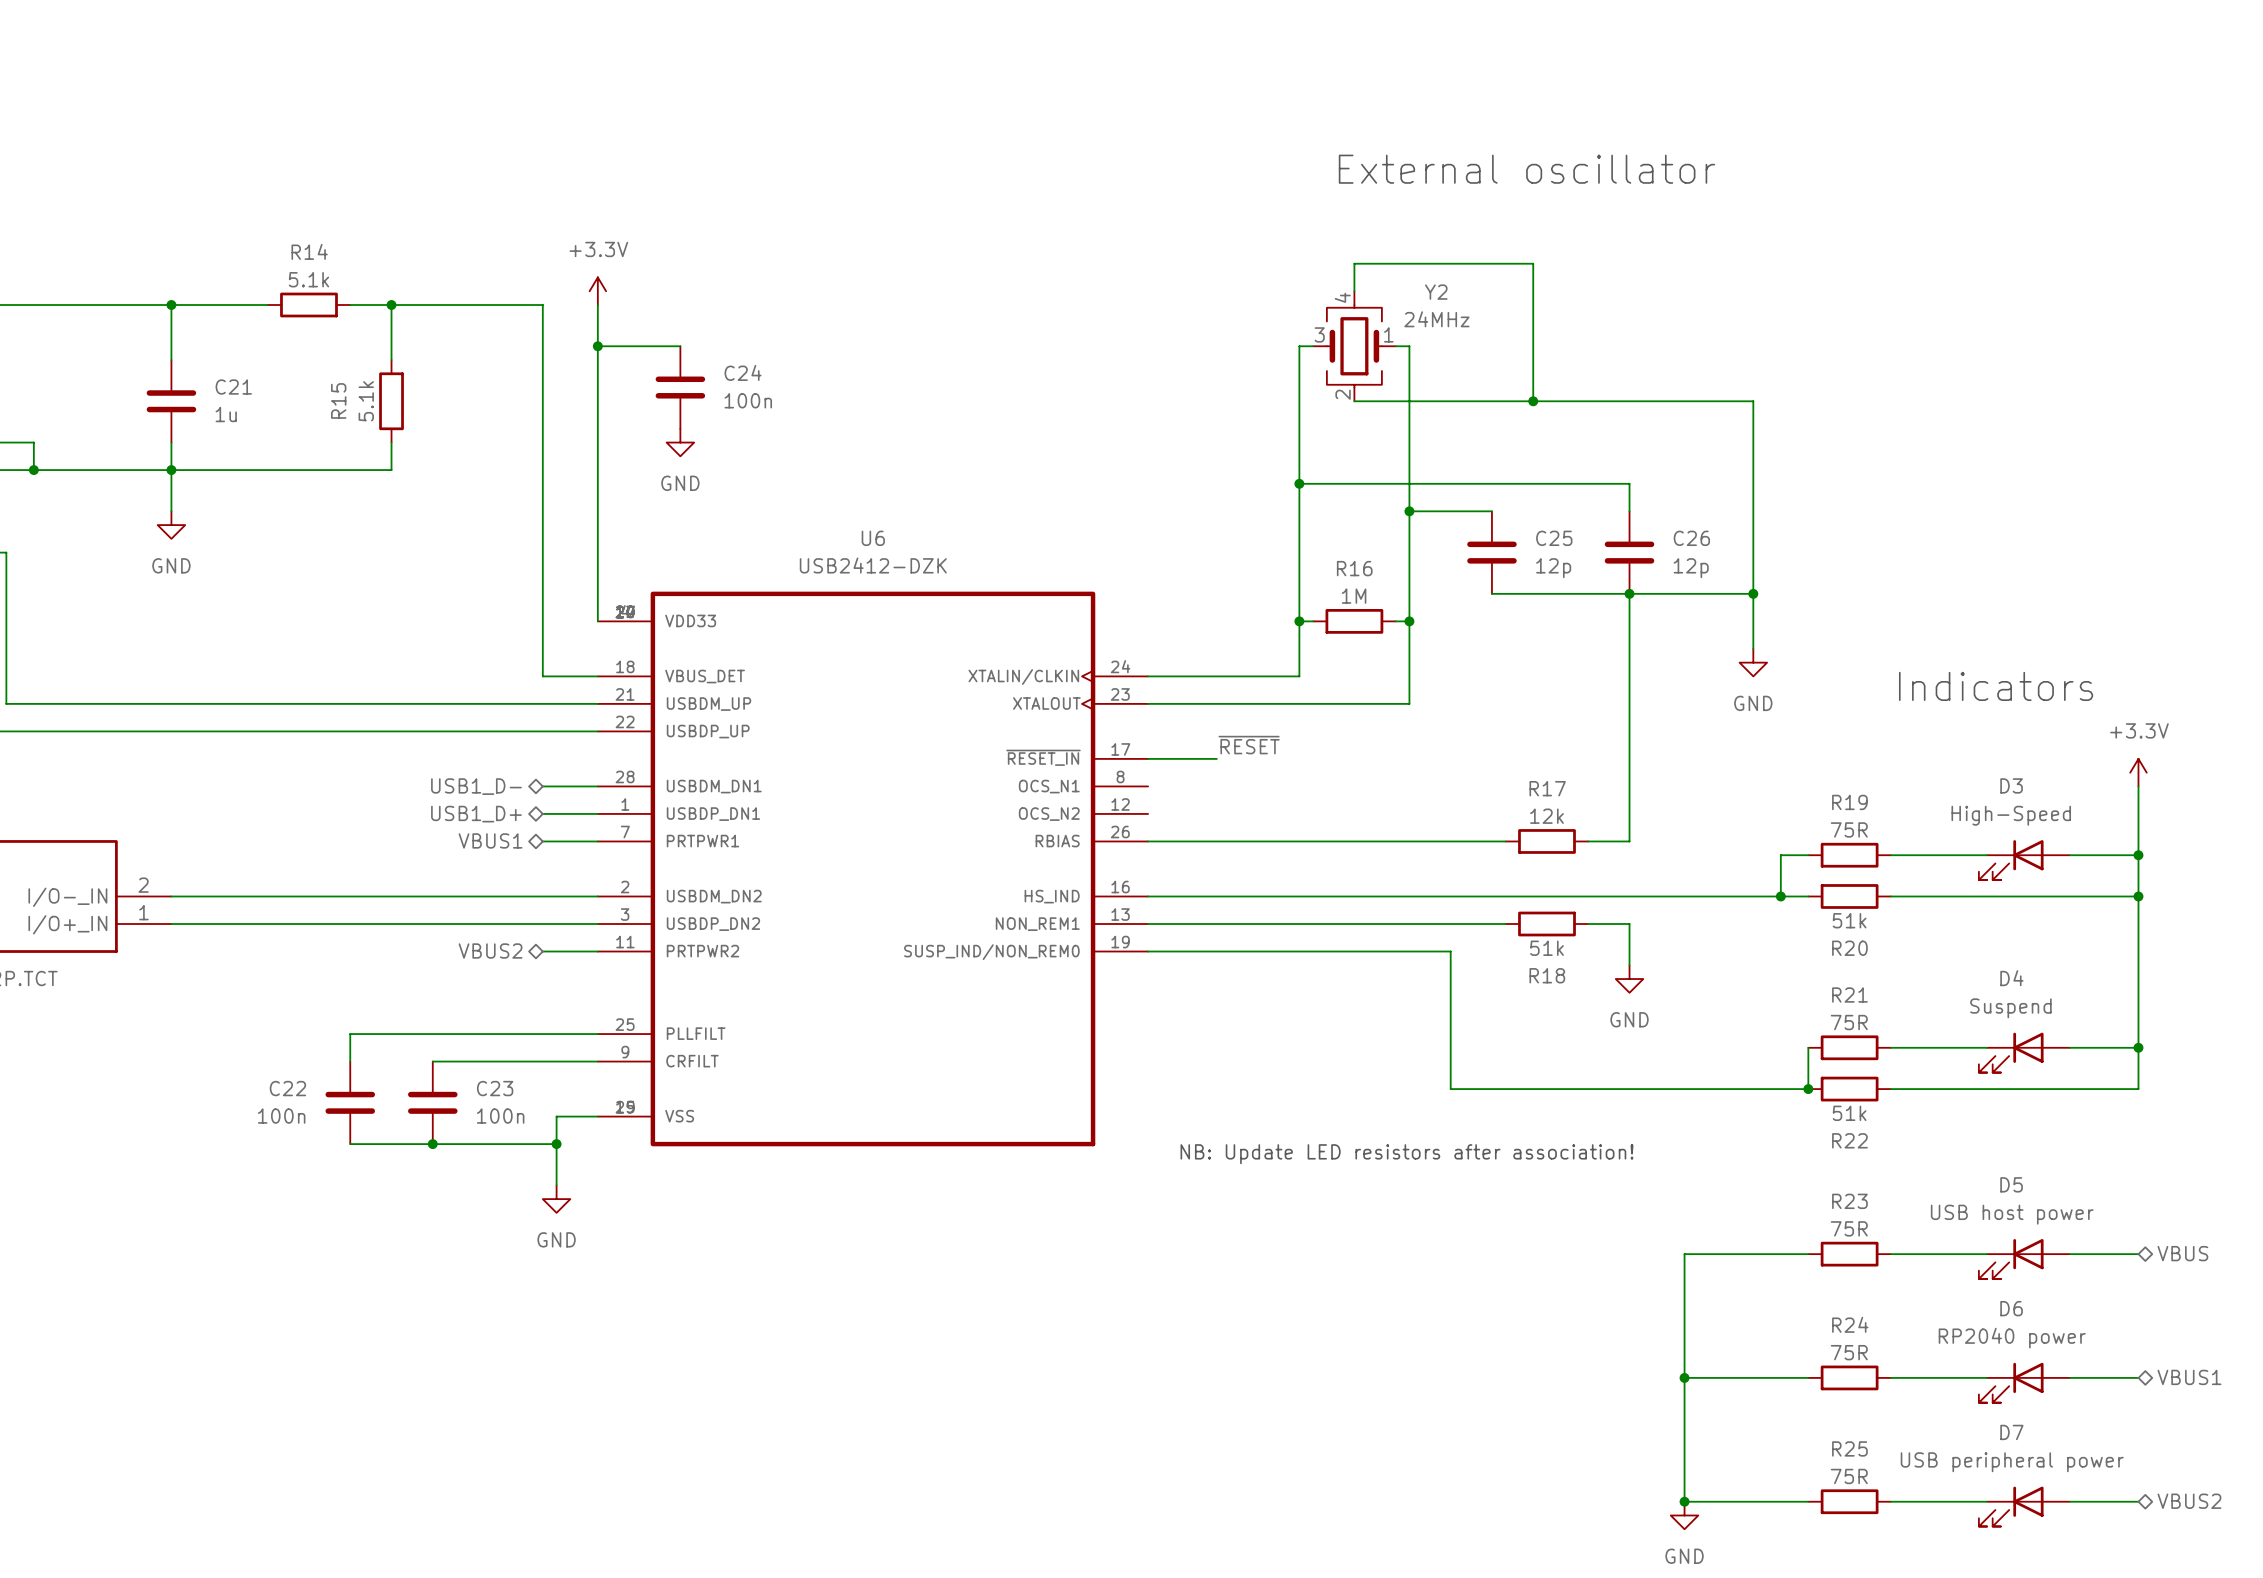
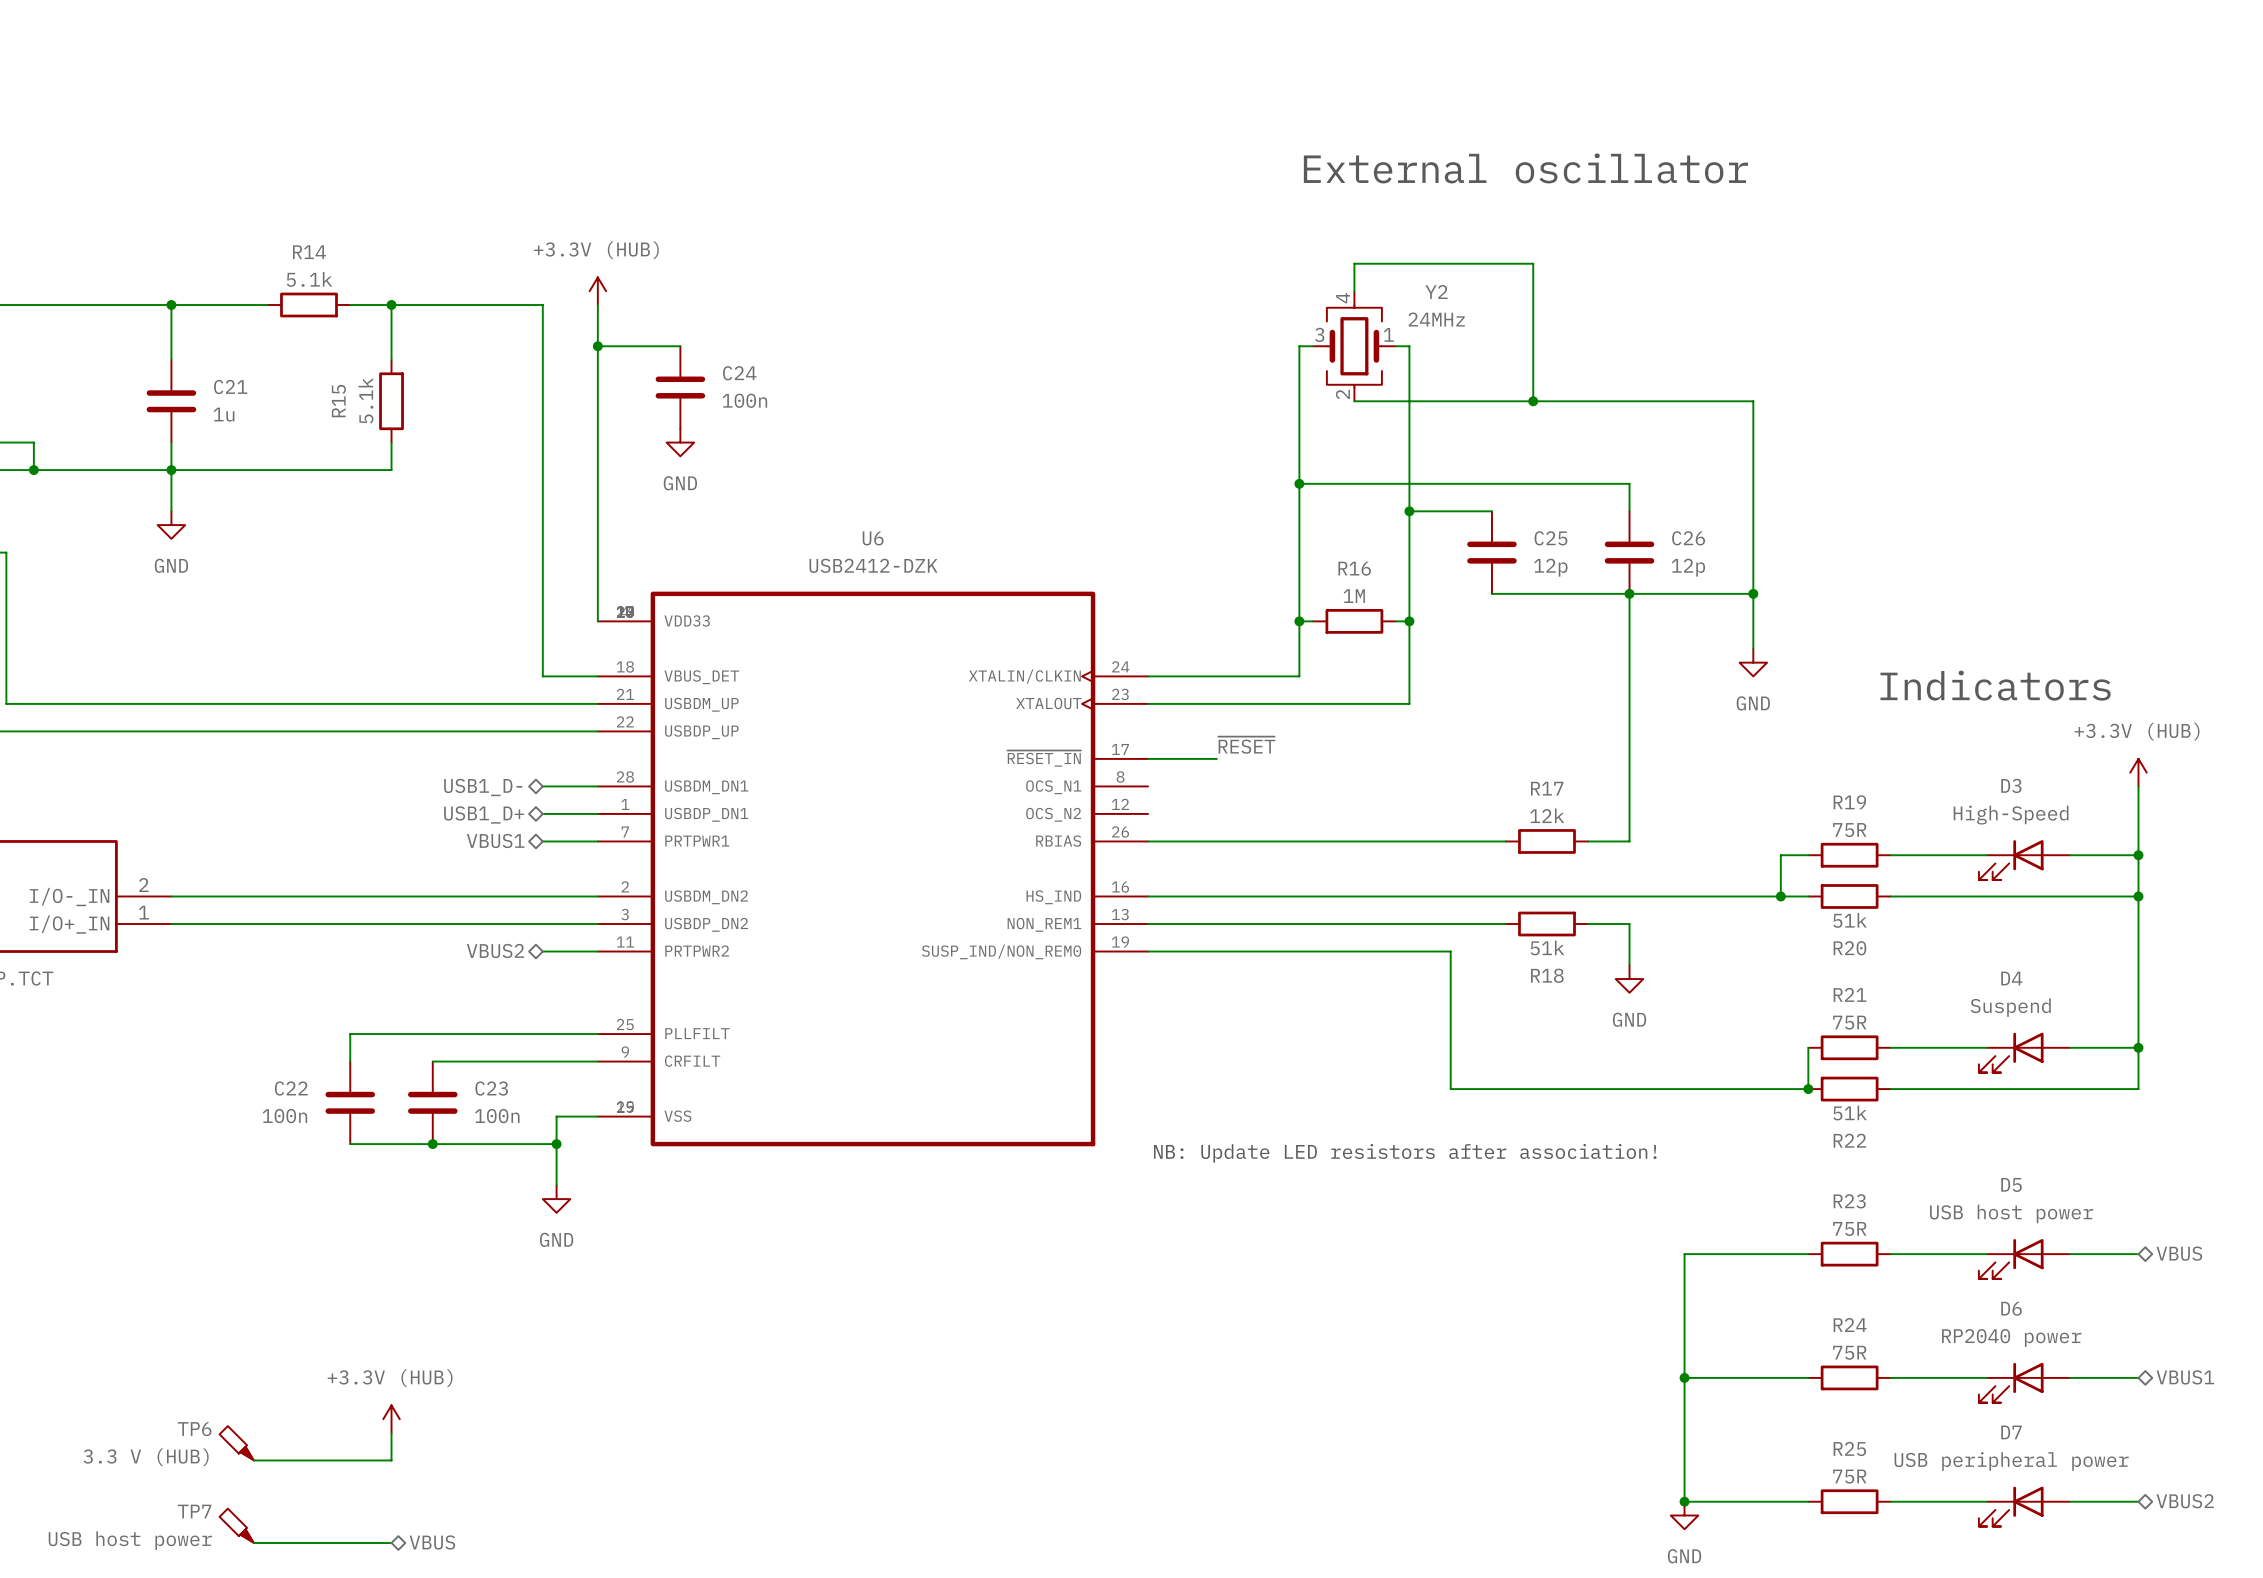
power symbol: +3.3V (597, 291) -> +3.3V (HUB) (597, 291)
power symbol: +3.3V (2138, 772) -> +3.3V (HUB) (2138, 772)
power symbol: none -> +3.3V (HUB) (391, 1419)
wire: none -> (391, 1432) (391, 1460) (253, 1460)
TP6: none -> 3.3 V (HUB) (236, 1443)
TP7: none -> USB host power (236, 1525)
hierarchical label: none -> VBUS (432, 1542)
wire: none -> (253, 1543) (391, 1543)

